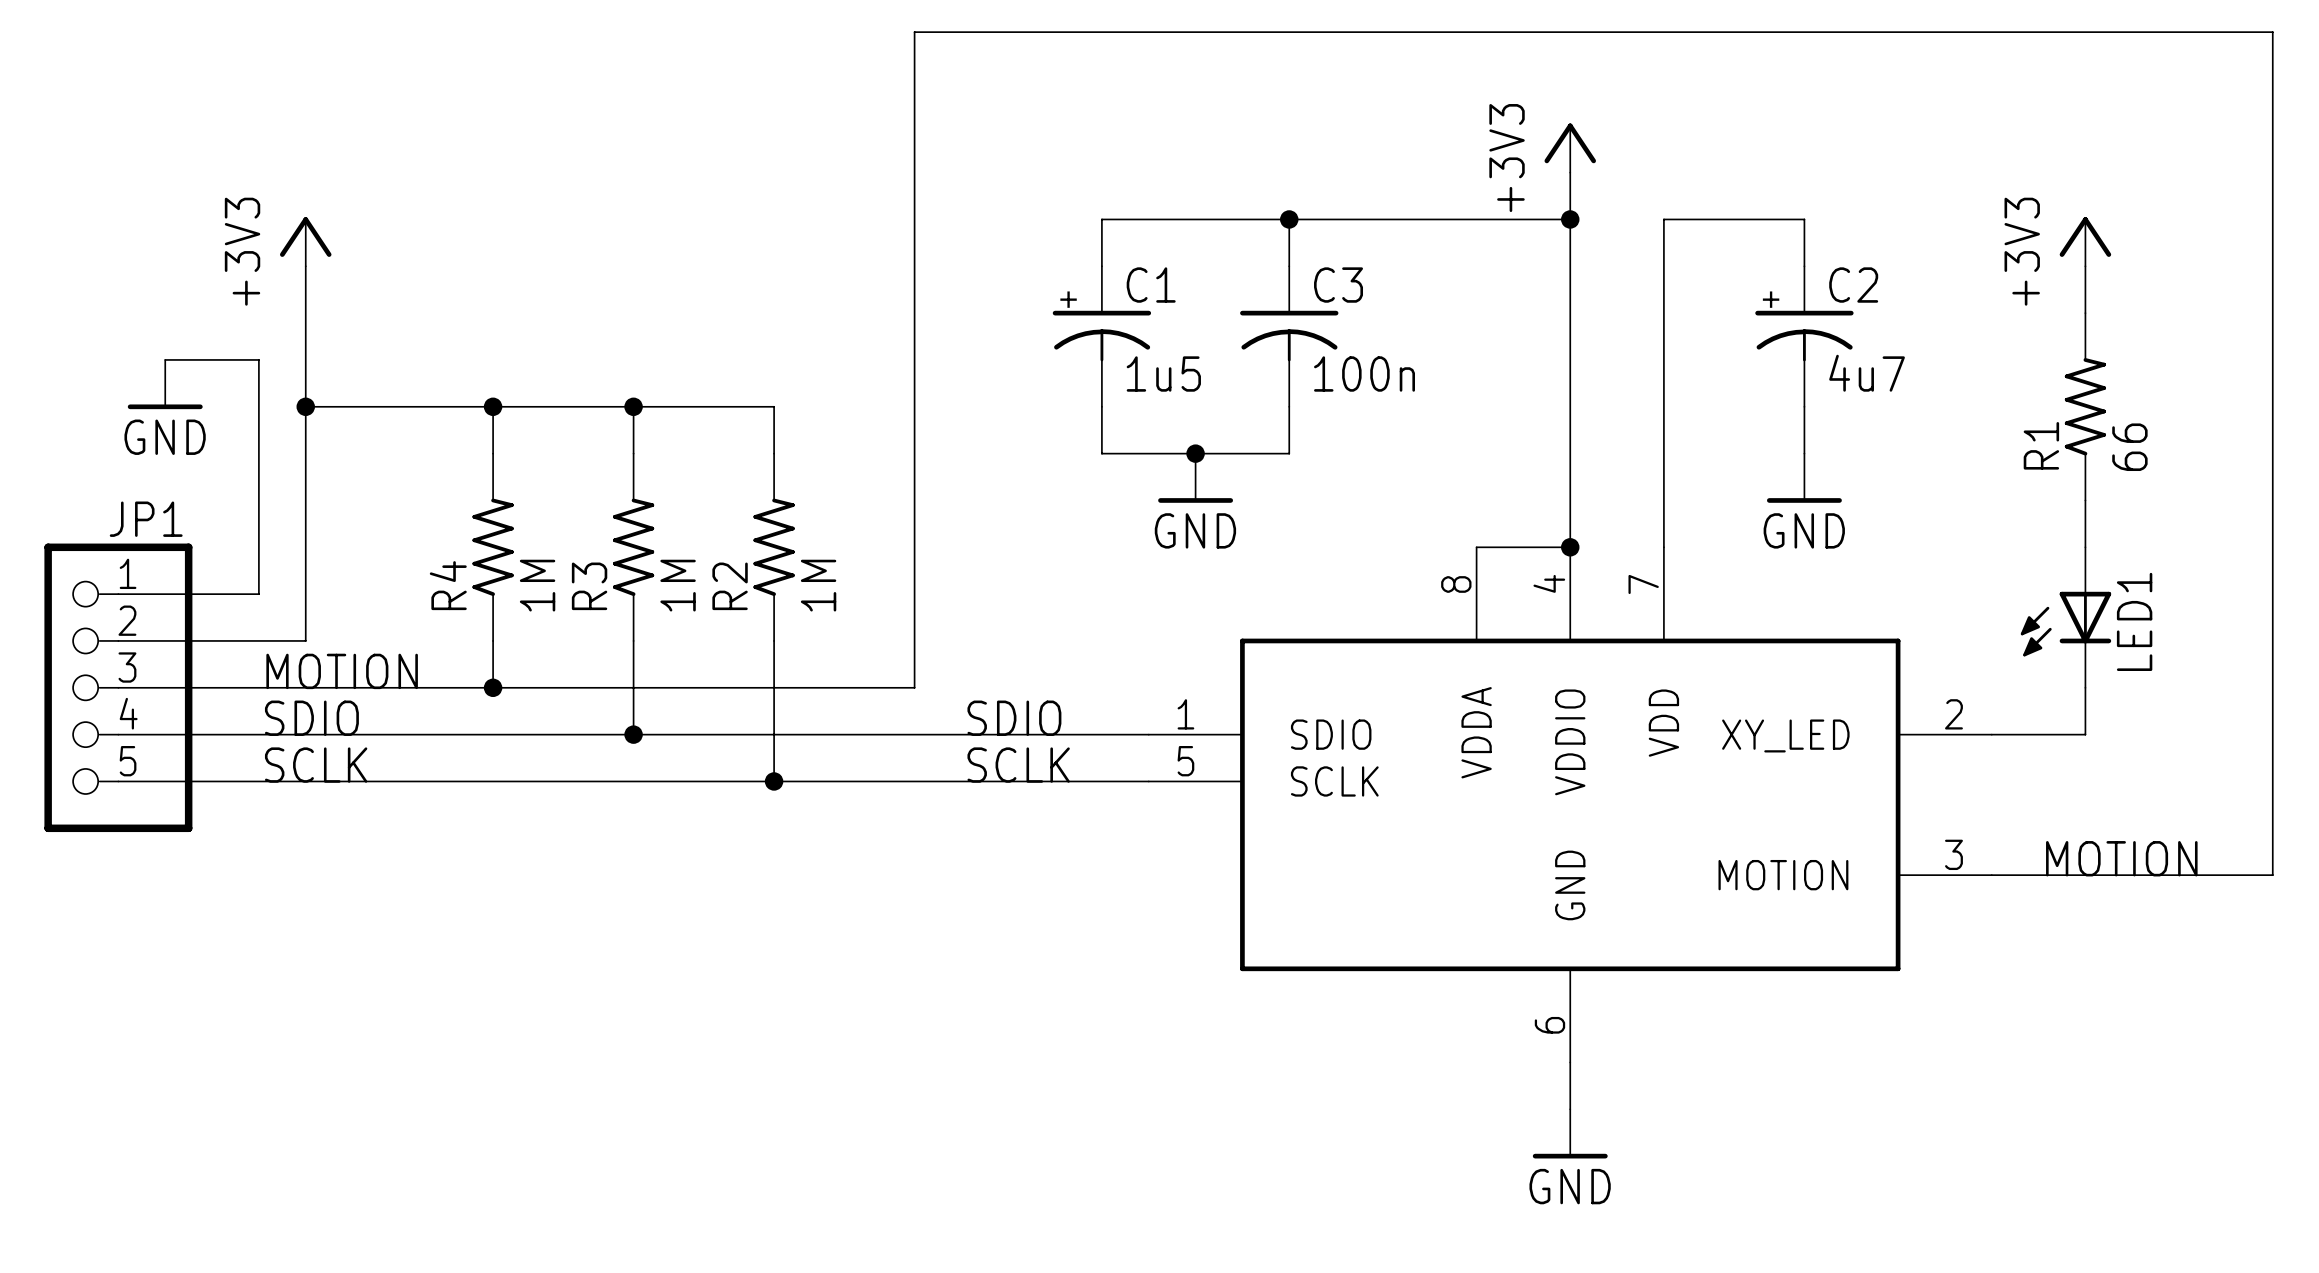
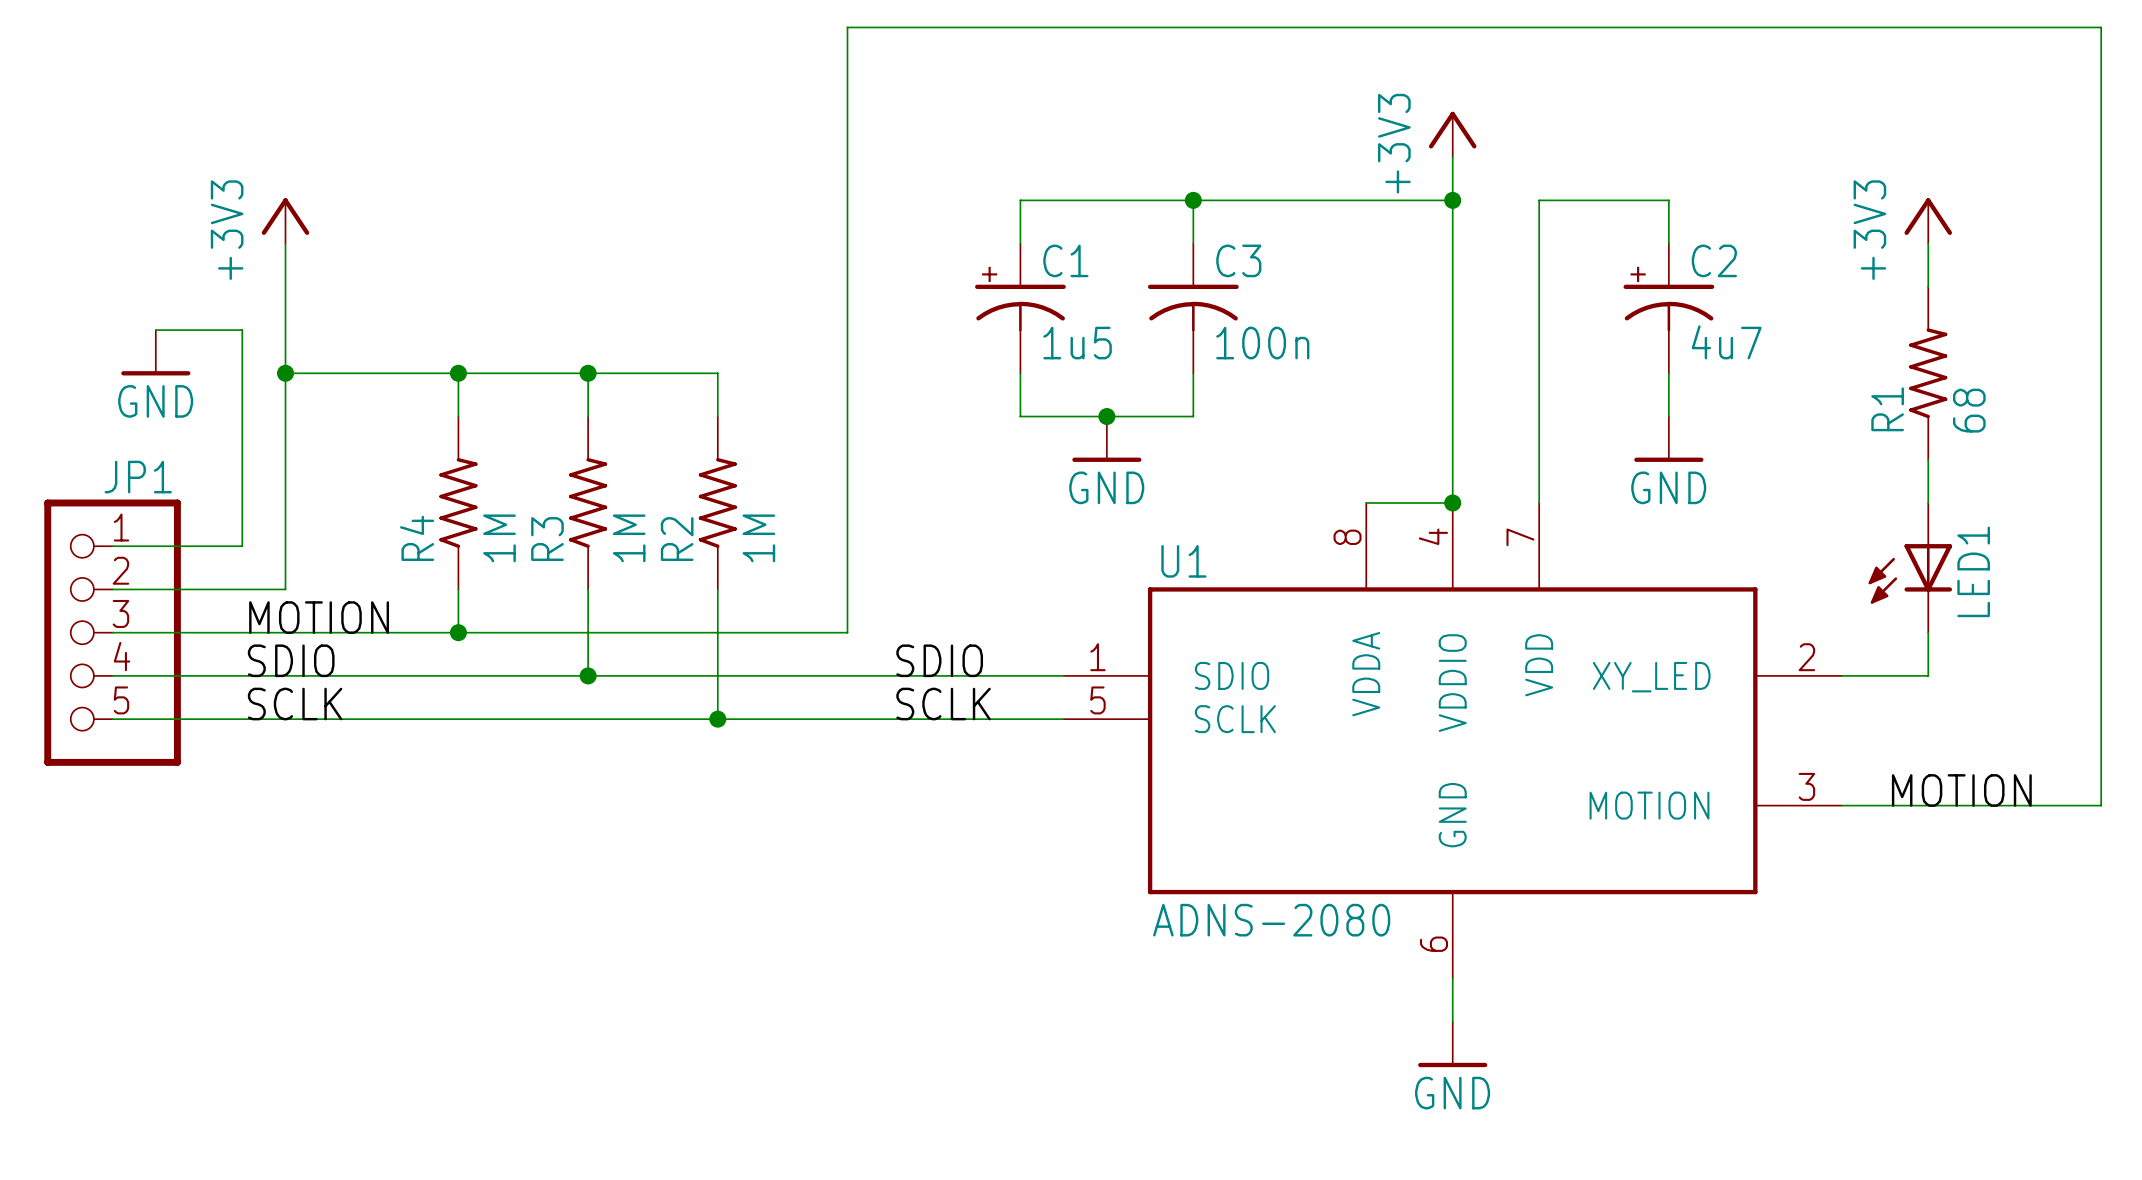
R1 value: 66 (2129, 447) -> 68 (1969, 410)
U1 name: none -> U1 (1183, 561)
U1 value: none -> ADNS-2080 (1271, 920)

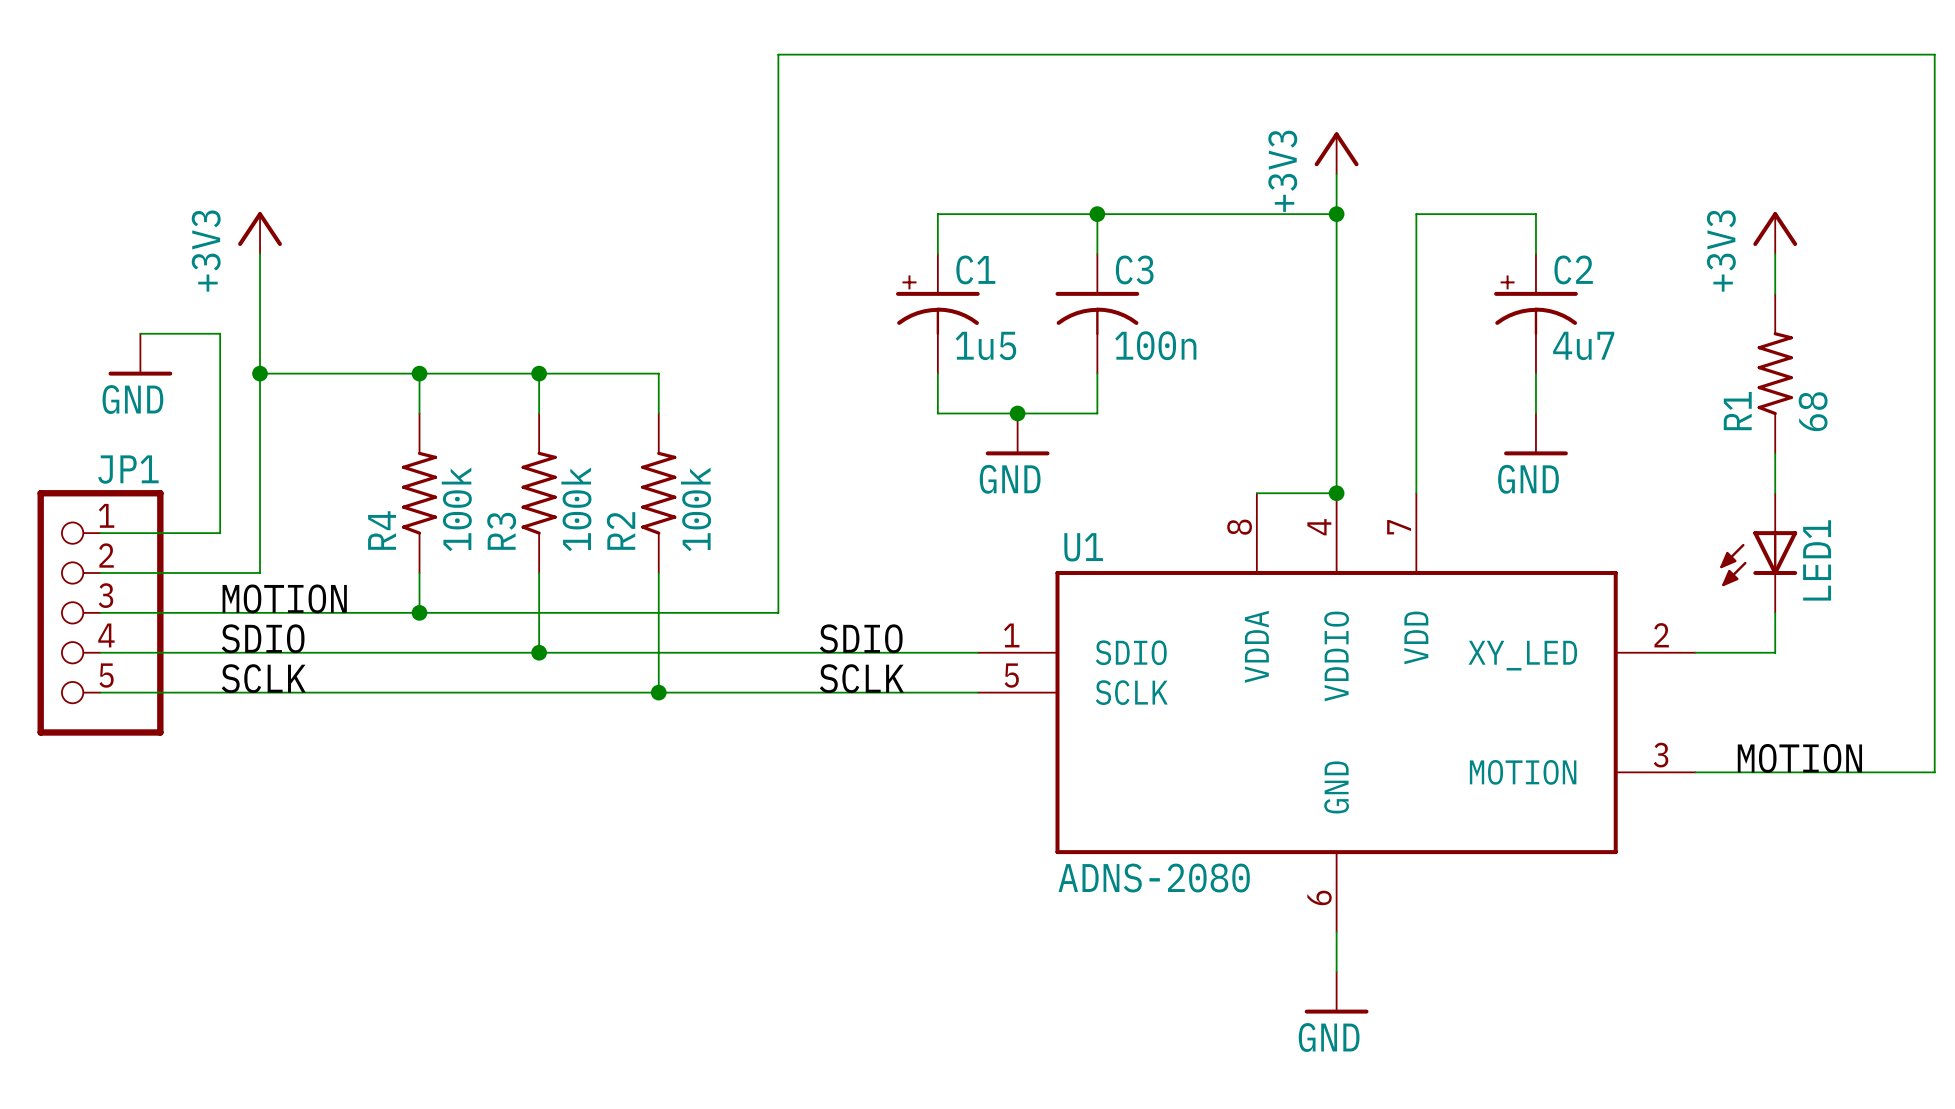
R4 value: 1M (499, 538) -> 100k (456, 509)
R3 value: 1M (629, 538) -> 100k (576, 509)
R2 value: 1M (758, 538) -> 100k (696, 509)

